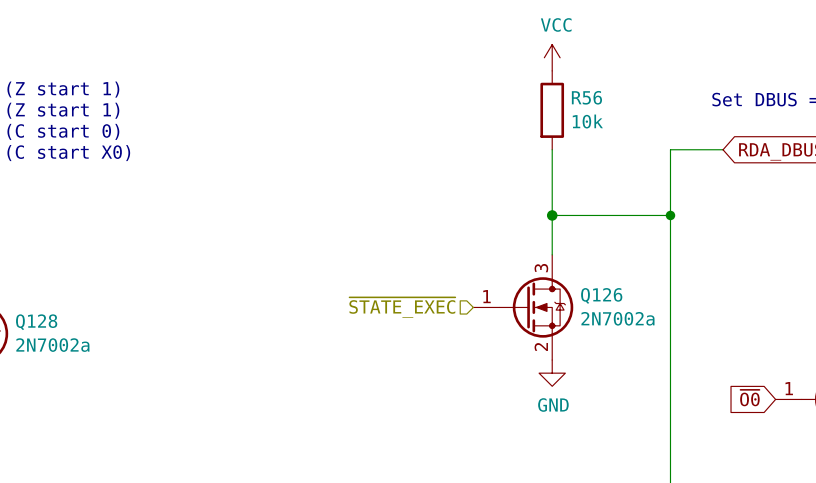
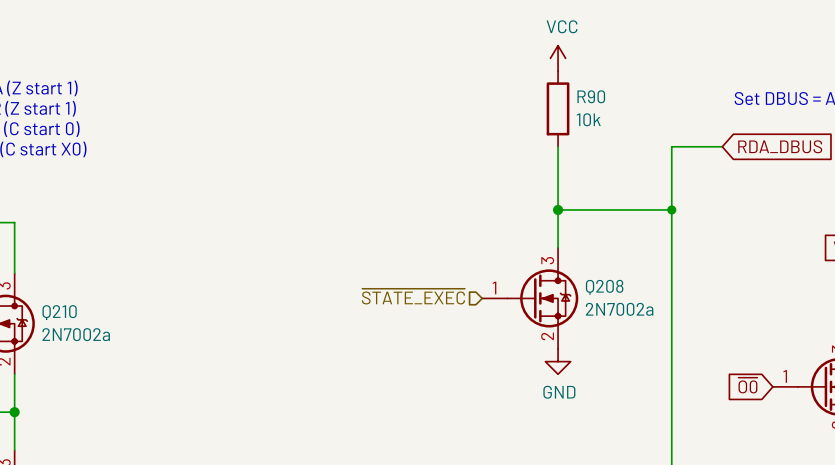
R56 name: R56 (586, 97) -> R90 (591, 96)
Q126 name: Q126 (601, 295) -> Q208 (604, 287)
Q128 name: Q128 (36, 322) -> Q210 (59, 312)

